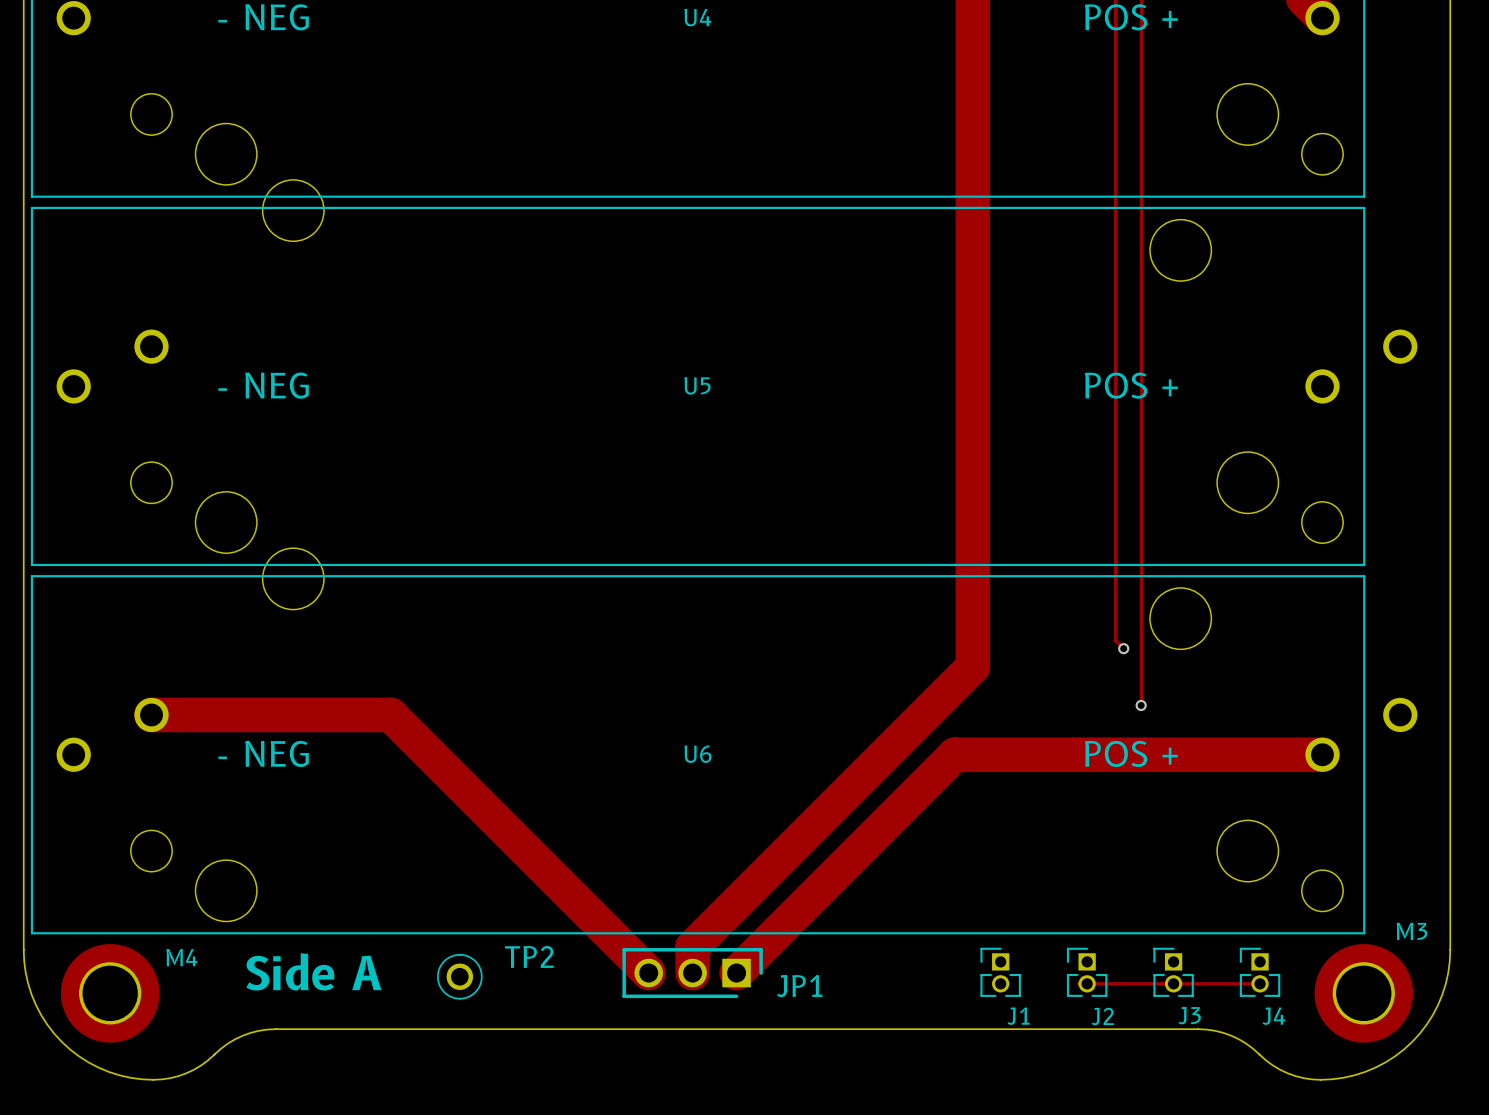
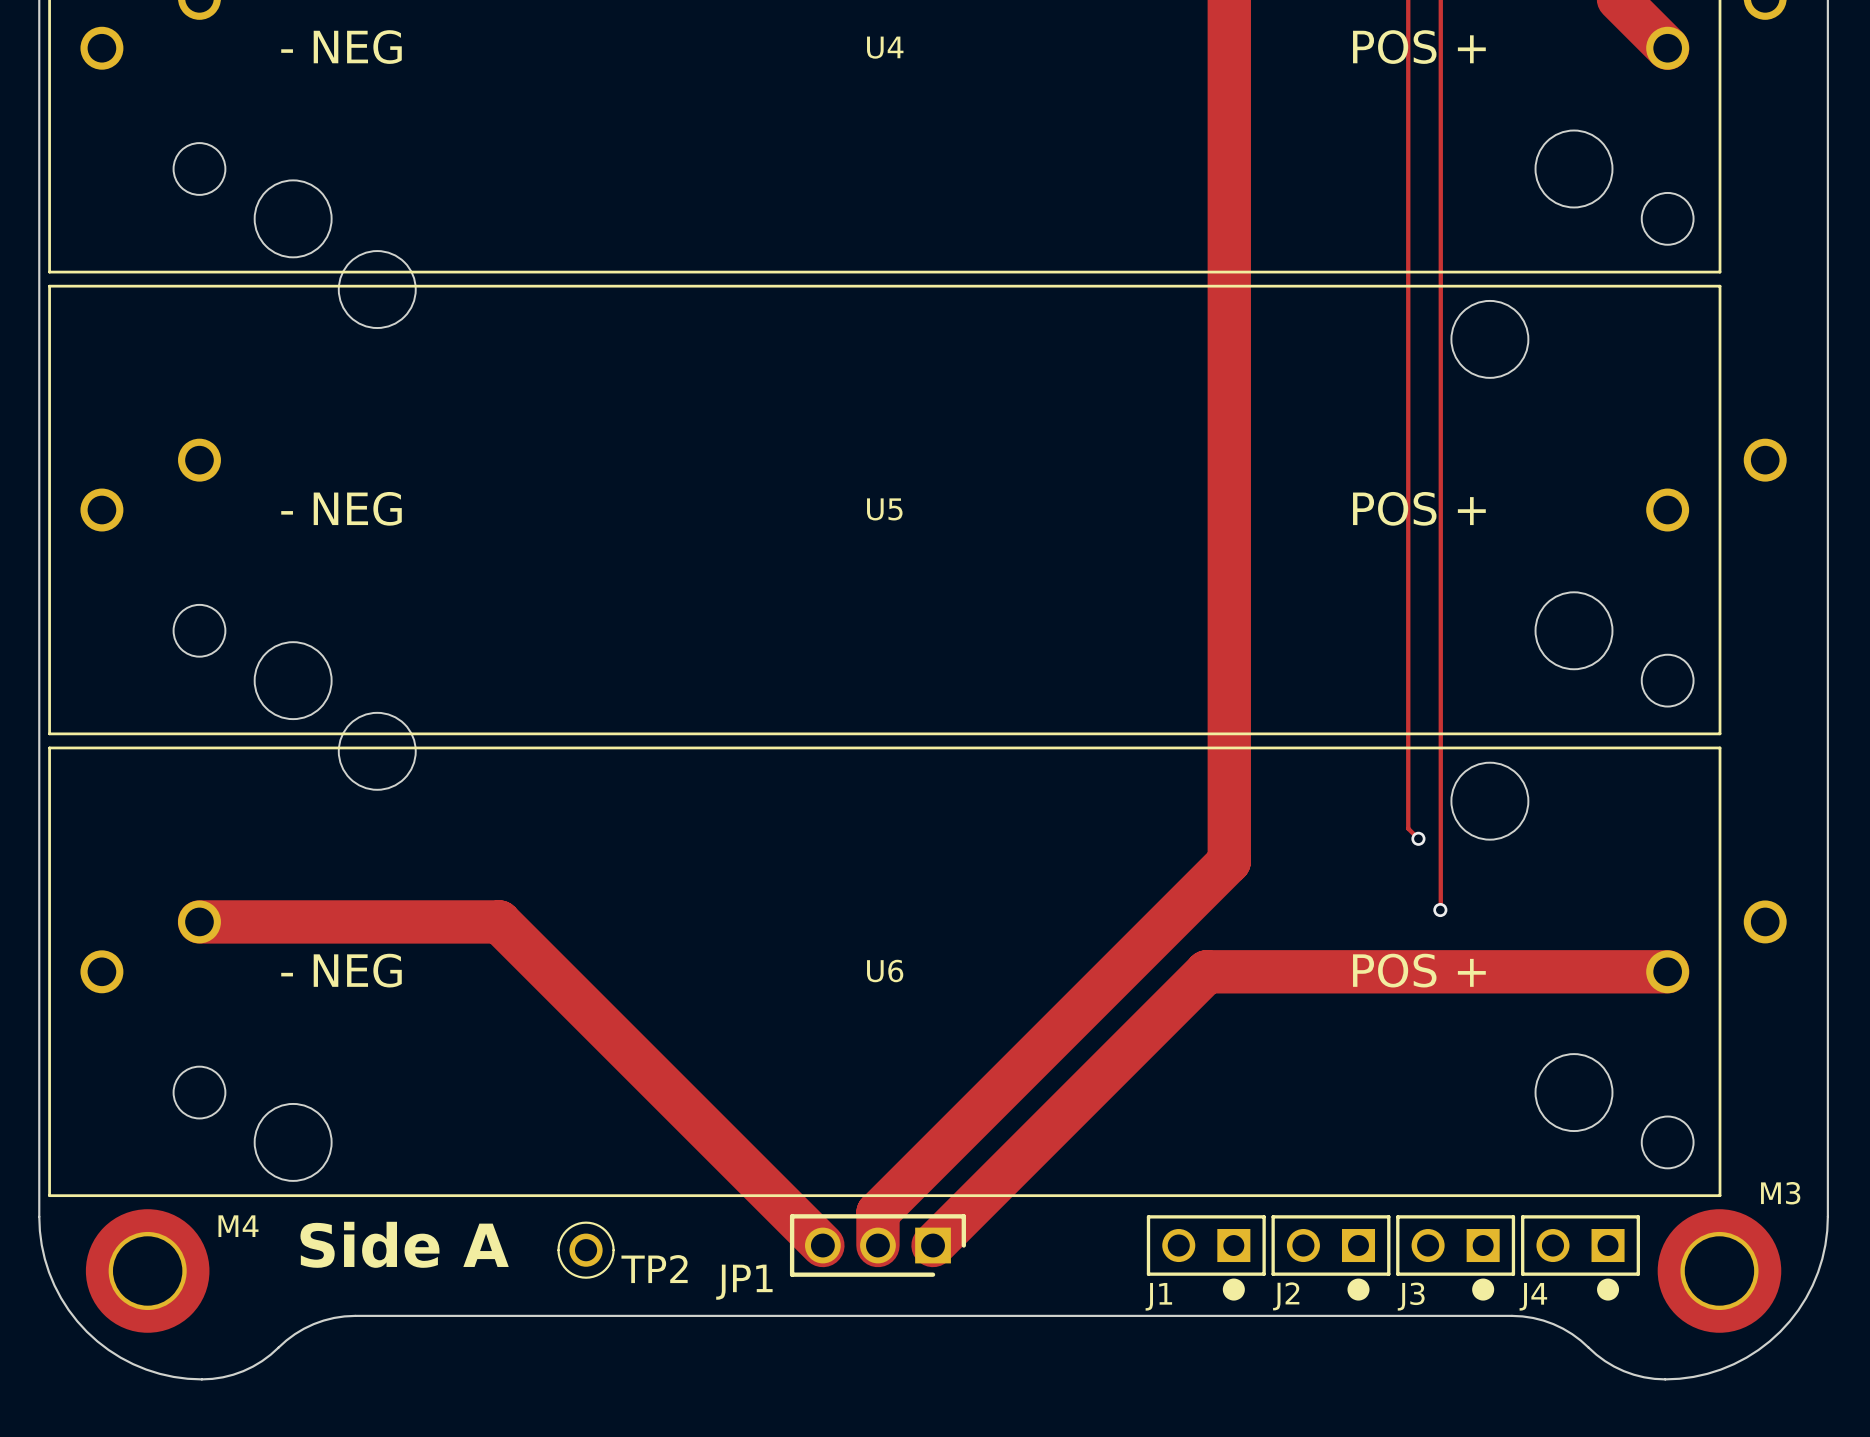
J1 footprint: [980, 947, 1021, 997] -> [1146, 1215, 1266, 1301]
J2 footprint: [1066, 947, 1108, 997] -> [1271, 1215, 1391, 1301]
J3 footprint: [1153, 947, 1194, 997] -> [1396, 1215, 1516, 1301]
J4 footprint: [1239, 947, 1281, 997] -> [1521, 1215, 1640, 1301]
TP2 name position: TP2 (529, 956) -> TP2 (654, 1269)
TP2 rotation: 0° (459, 976) -> 90° clockwise (586, 1250)
track: (1078, 983) (1260, 983) -> none
JP1 name position: JP1 (799, 986) -> JP1 (744, 1282)
J3 name position: J3 (1189, 1015) -> J3 (1411, 1296)
J1 name position: J1 (1018, 1016) -> J1 (1158, 1296)
J2 name position: J2 (1102, 1016) -> J2 (1286, 1296)
J4 name position: J4 (1273, 1016) -> J4 (1533, 1296)

